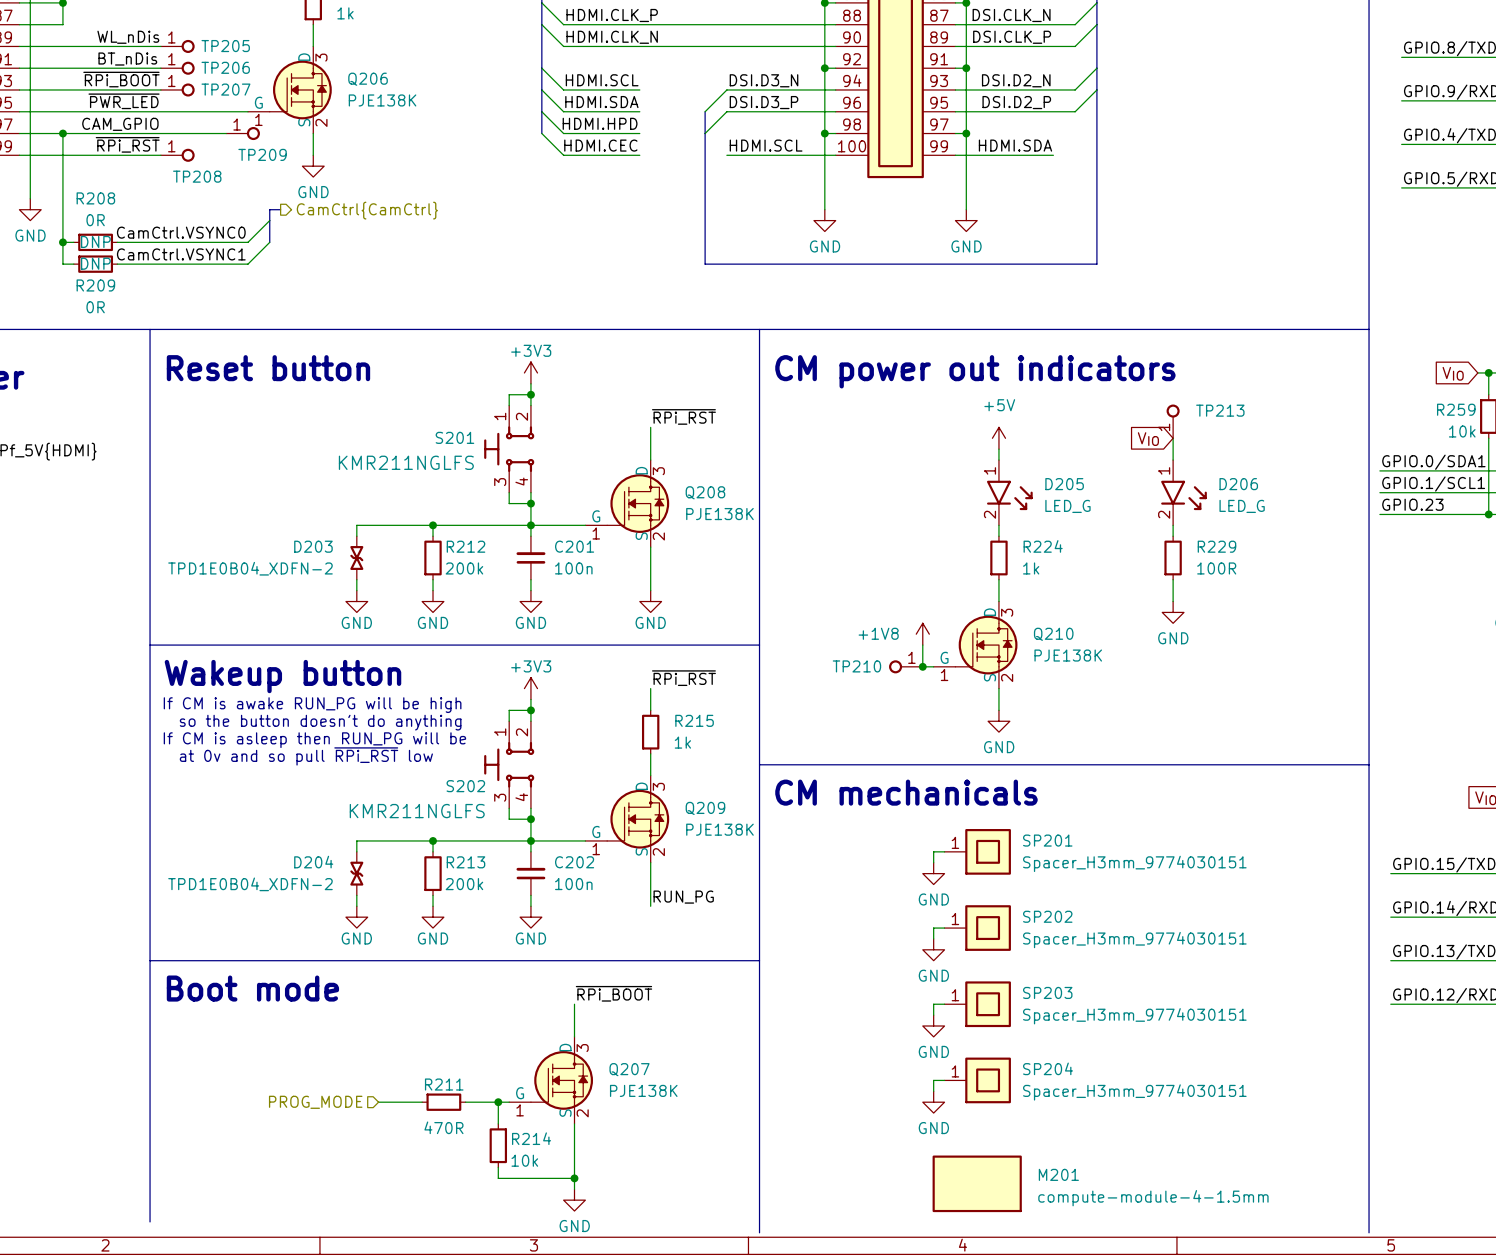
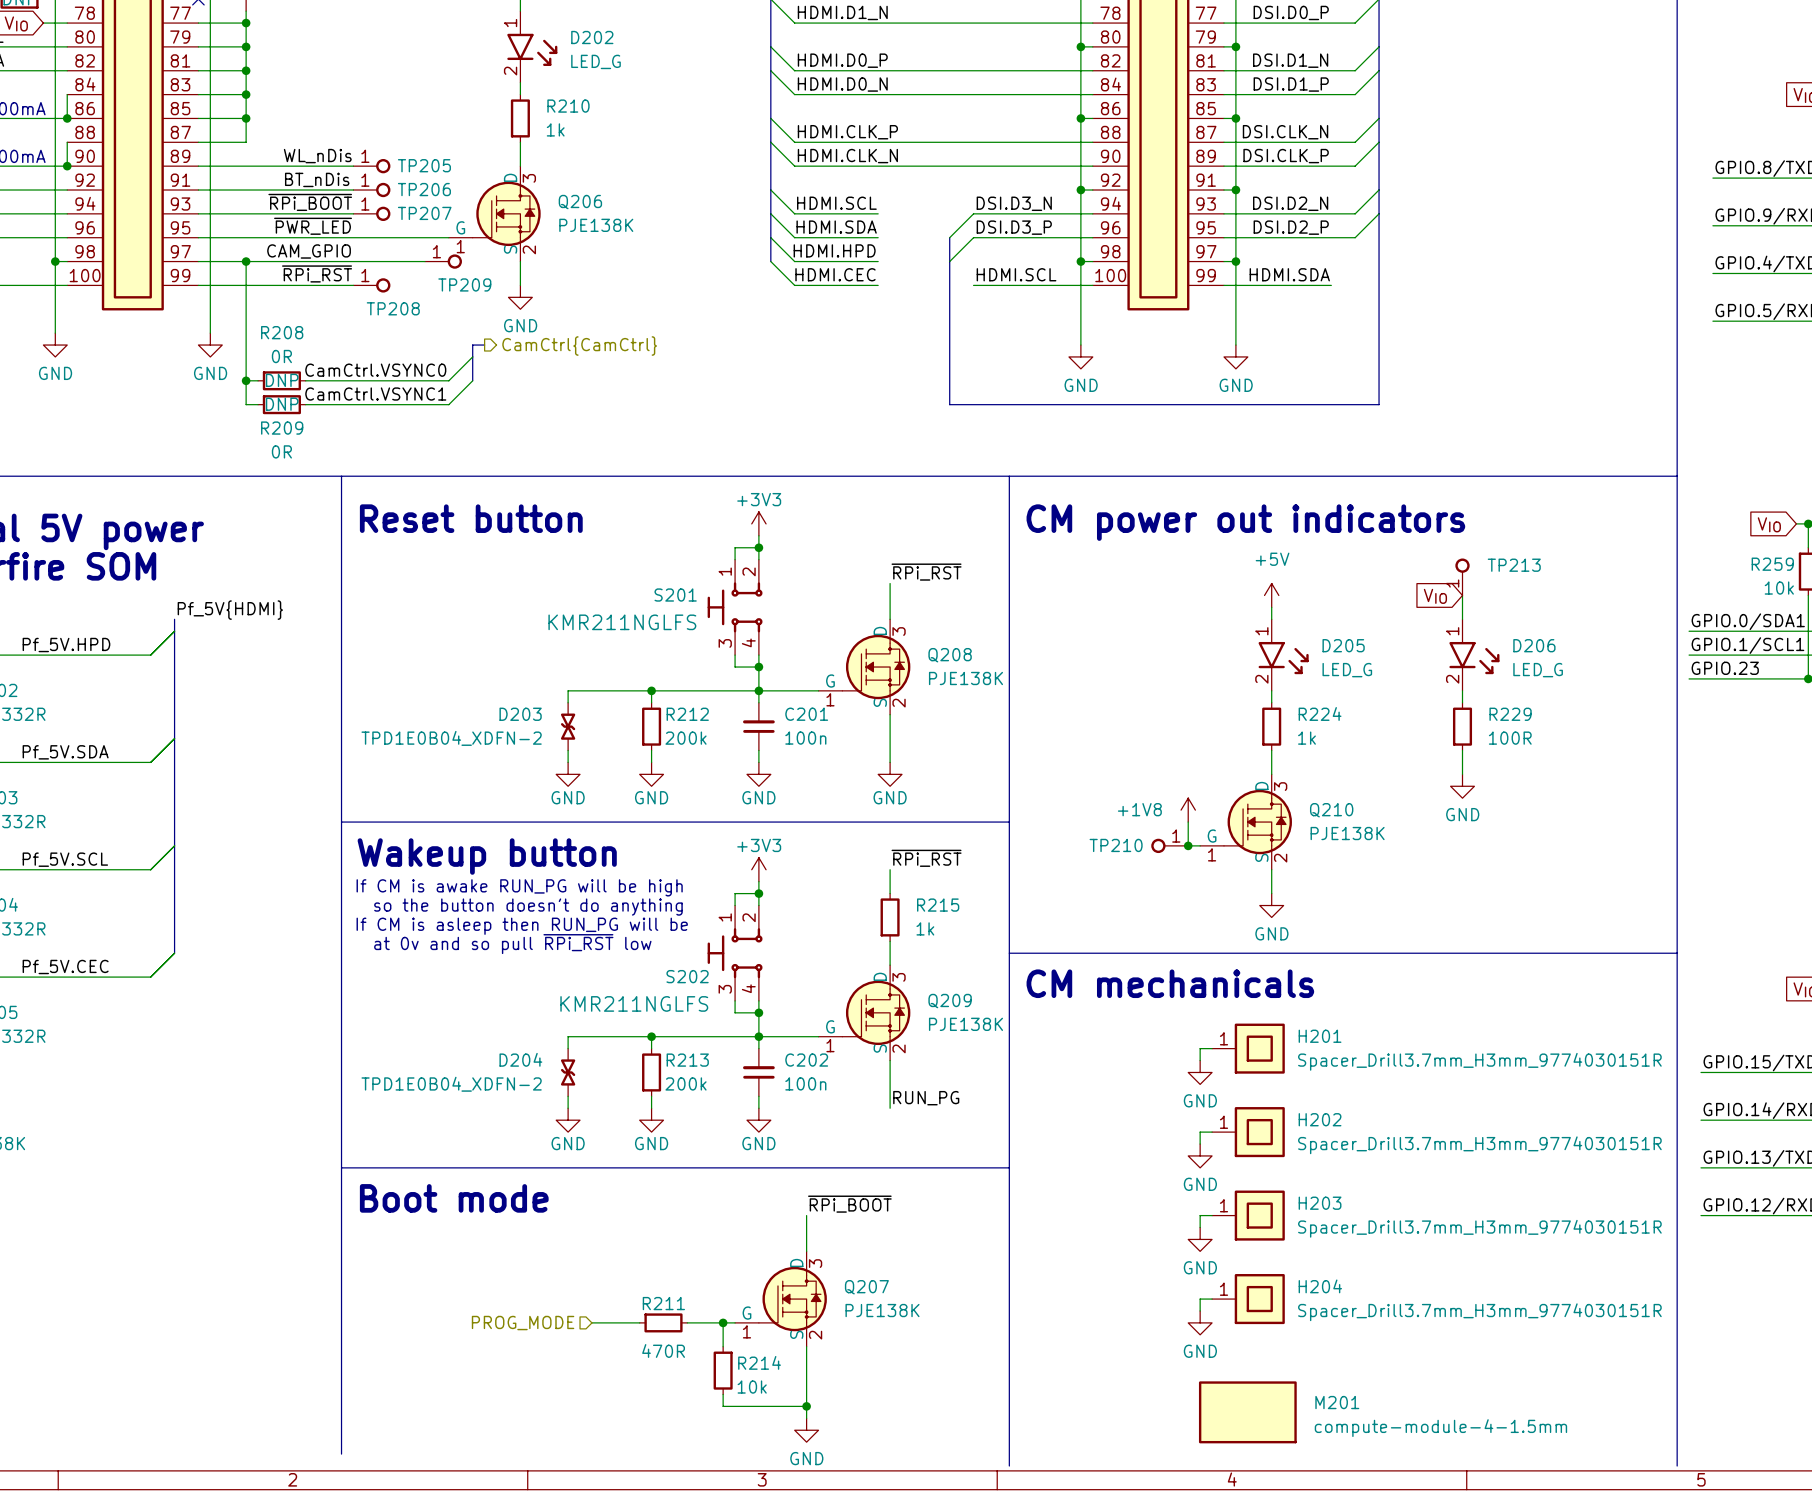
SP201 name: SP201 (1047, 840) -> H201 (1320, 1036)
SP201 value: Spacer_H3mm_9774030151 (1134, 863) -> Spacer_Drill3.7mm_H3mm_9774030151R (1479, 1061)
SP202 name: SP202 (1047, 916) -> H202 (1320, 1119)
SP202 value: Spacer_H3mm_9774030151 (1134, 940) -> Spacer_Drill3.7mm_H3mm_9774030151R (1479, 1145)
SP203 name: SP203 (1047, 992) -> H203 (1320, 1203)
SP203 value: Spacer_H3mm_9774030151 (1134, 1016) -> Spacer_Drill3.7mm_H3mm_9774030151R (1479, 1228)
SP204 name: SP204 (1048, 1068) -> H204 (1320, 1286)
SP204 value: Spacer_H3mm_9774030151 (1134, 1092) -> Spacer_Drill3.7mm_H3mm_9774030151R (1479, 1312)

